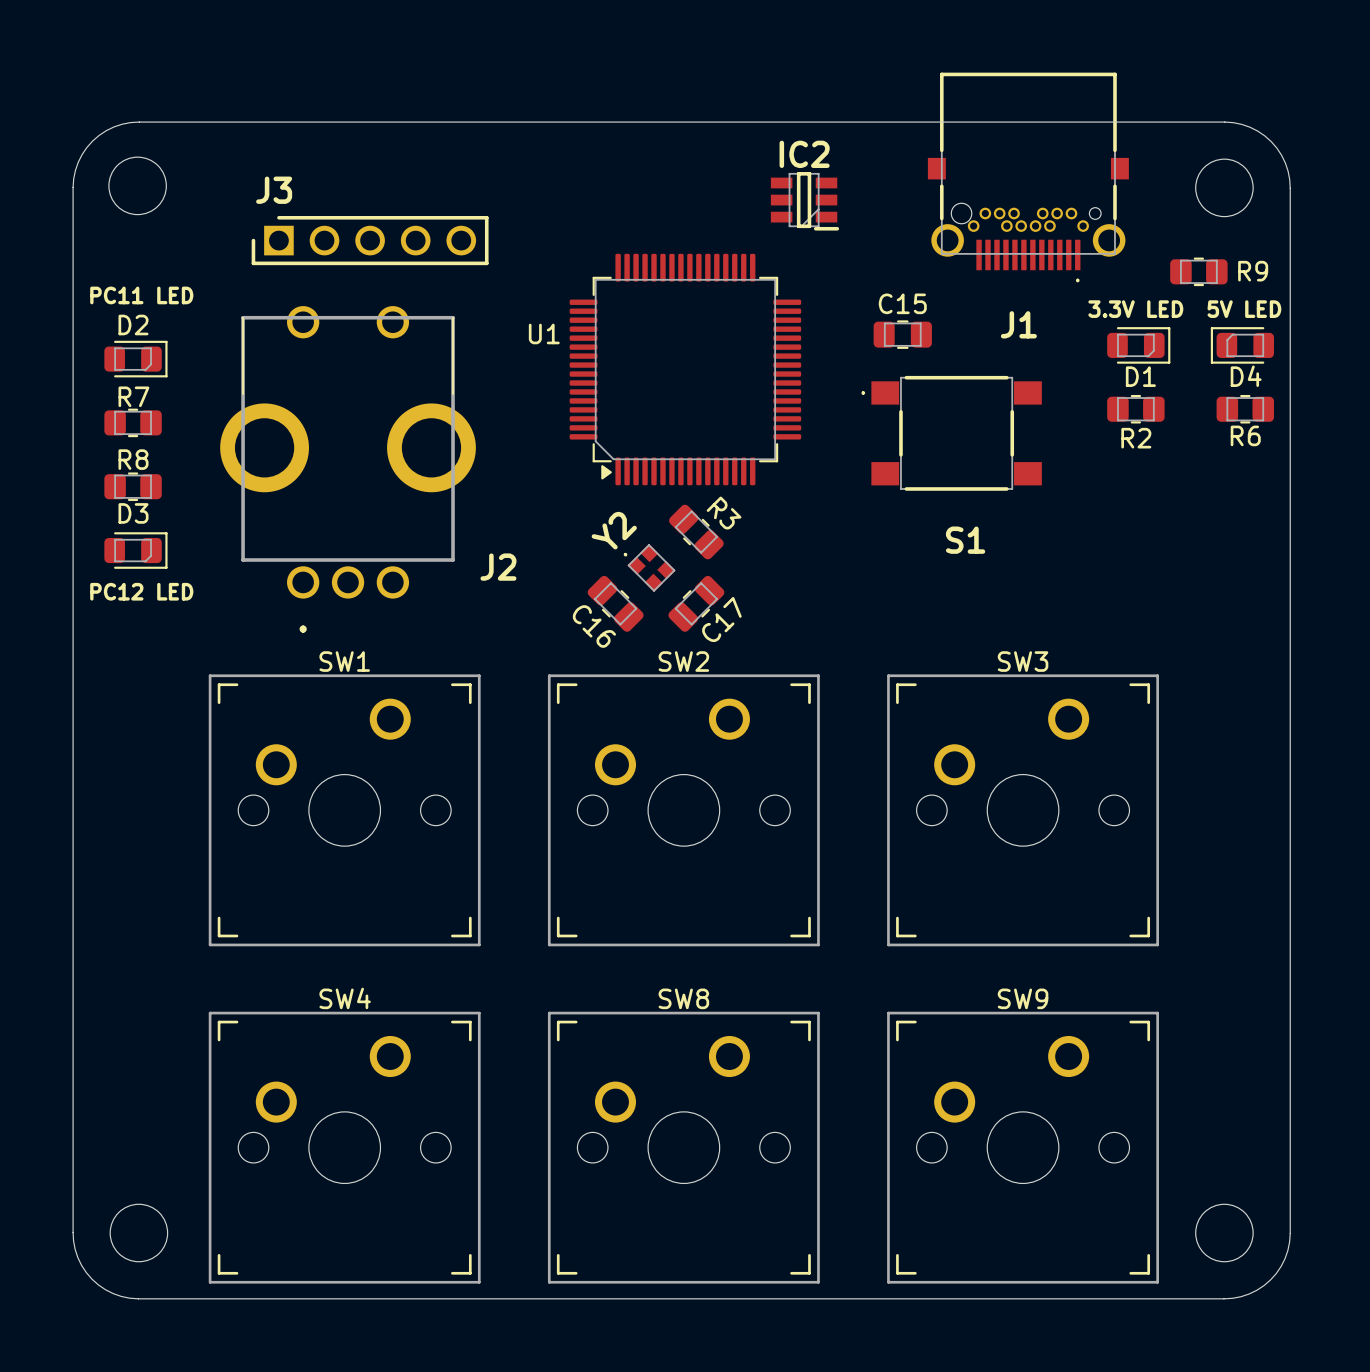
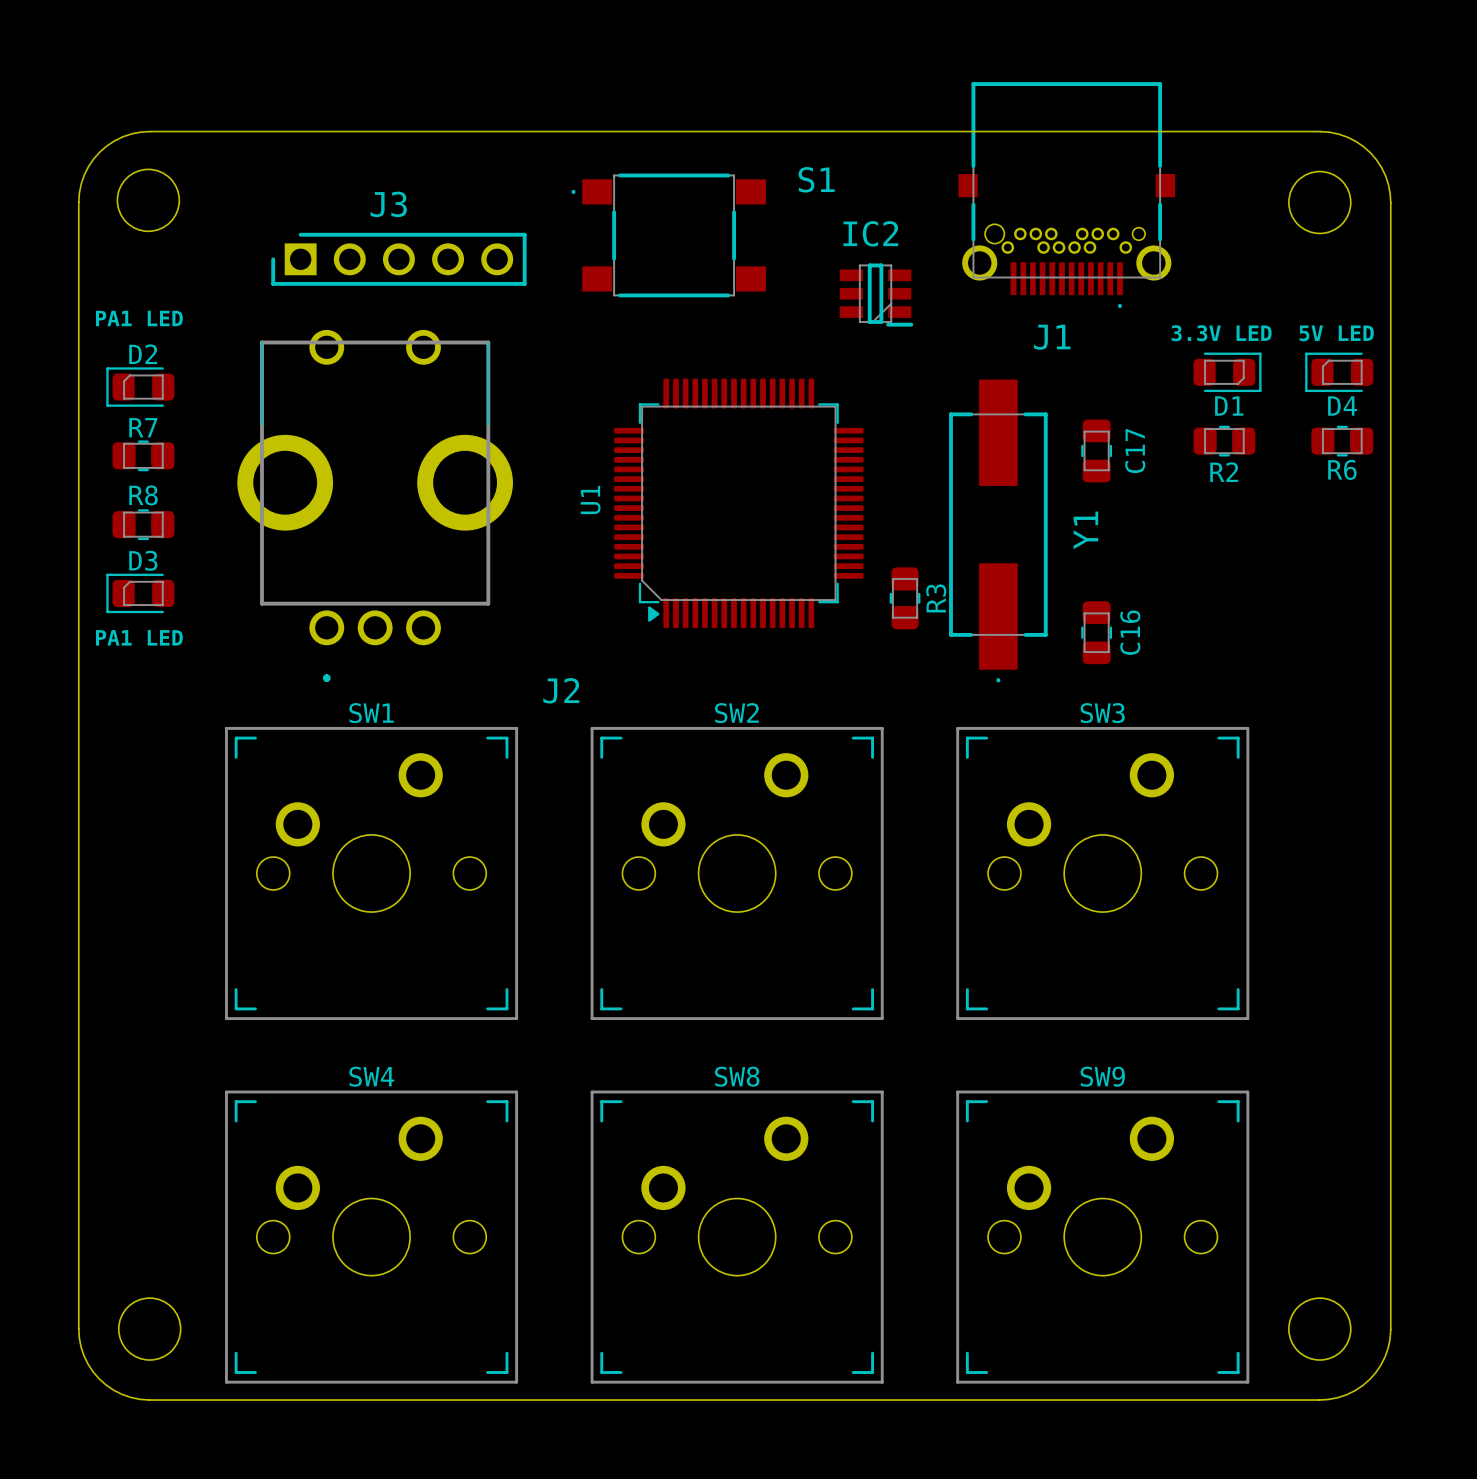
J1 footprint: [927, 72, 1129, 283] -> [958, 82, 1176, 309]
IC2 name position: IC2 (804, 154) -> IC2 (870, 233)
J3 name position: J3 (274, 190) -> J3 (388, 204)
IC2 position: (804, 201) -> (876, 295)
R9: (1198, 271) -> none
text: PC11 LED (141, 295) -> PA1 LED (139, 318)
U1 name rotation: 0° (544, 333) -> 90° counterclockwise (590, 500)
C15: (902, 334) -> none
D2 rotation: 0° (135, 359) -> 180° (140, 387)
U1 position: (685, 369) -> (738, 503)
S1 position: (951, 433) -> (668, 235)
Y1: none -> (998, 530)
R3 rotation: 0° (696, 532) -> 45° clockwise (905, 598)
R3 position: (696, 532) -> (905, 598)
S1 name position: S1 (965, 540) -> S1 (816, 179)
D3 rotation: 0° (135, 550) -> 180° (140, 593)
J2 name position: J2 (498, 567) -> J2 (561, 690)
Y2: (649, 567) -> none
text: PC12 LED (141, 591) -> PA1 LED (139, 637)
C16 rotation: 0° (615, 603) -> 45° clockwise (1096, 632)
C16 position: (615, 603) -> (1096, 632)
C17 rotation: 0° (696, 603) -> 45° counterclockwise (1096, 450)
C17 position: (696, 603) -> (1096, 450)
C16 name position: C16 (594, 626) -> C16 (1130, 632)

